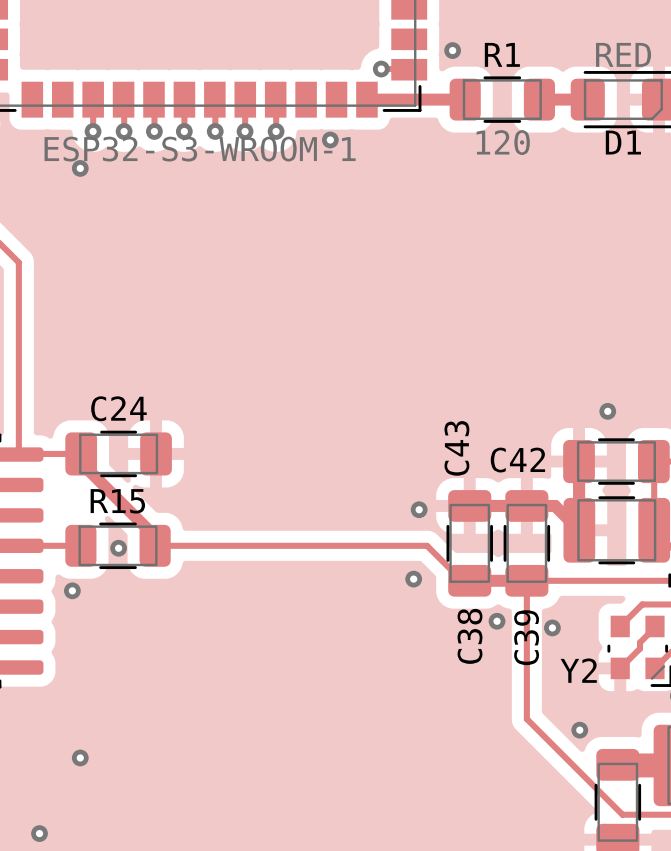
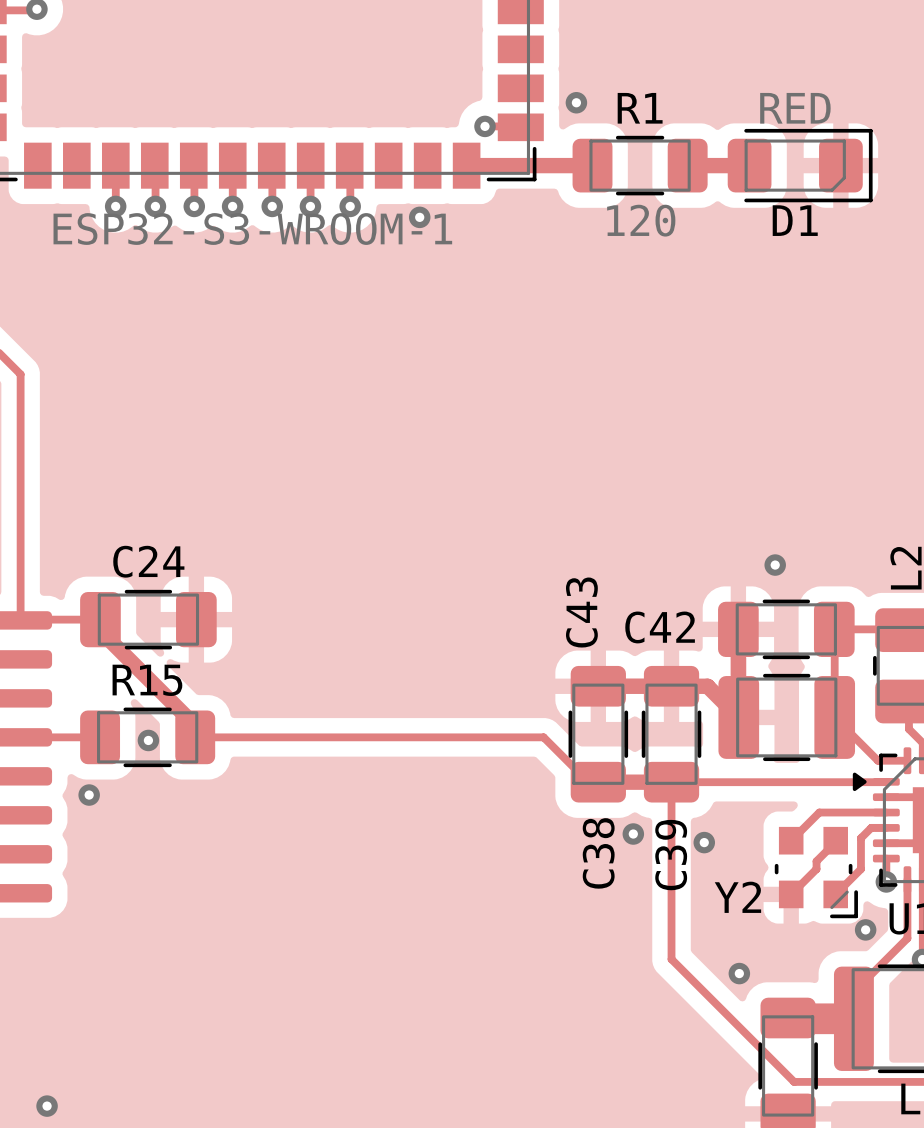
via: (80, 168) -> none
via: (419, 509) -> none
via: (413, 579) -> none
via: (80, 757) -> none

